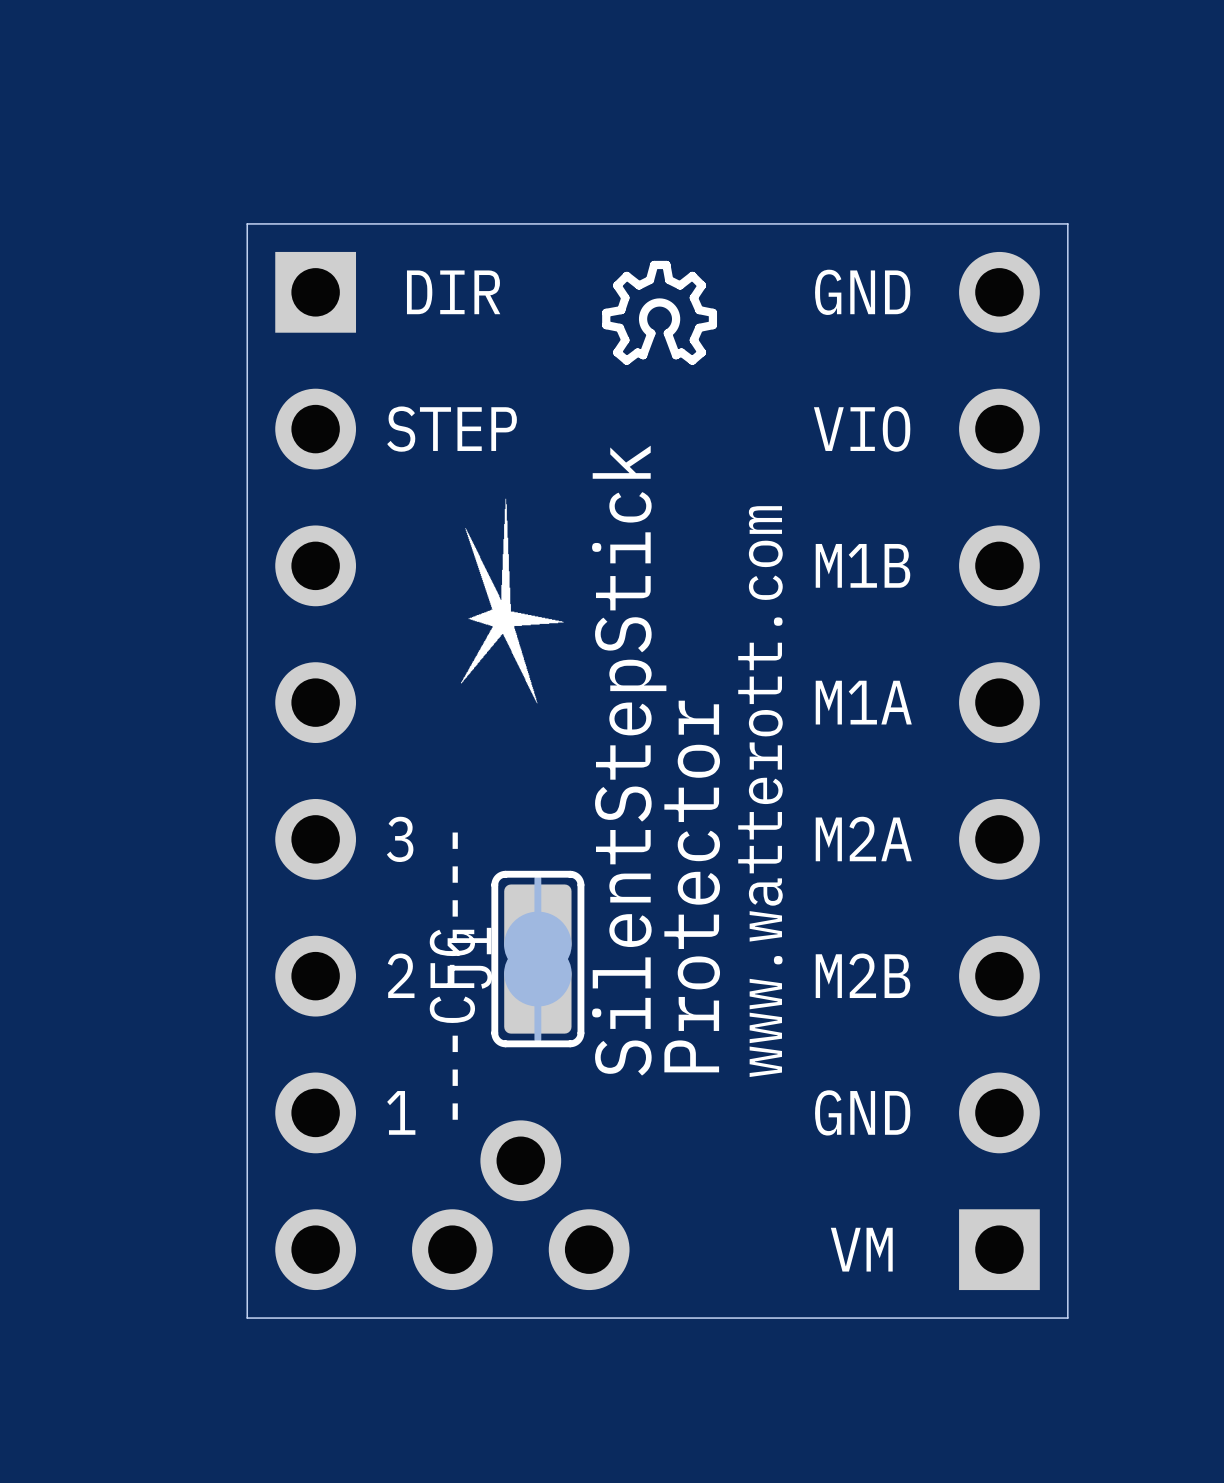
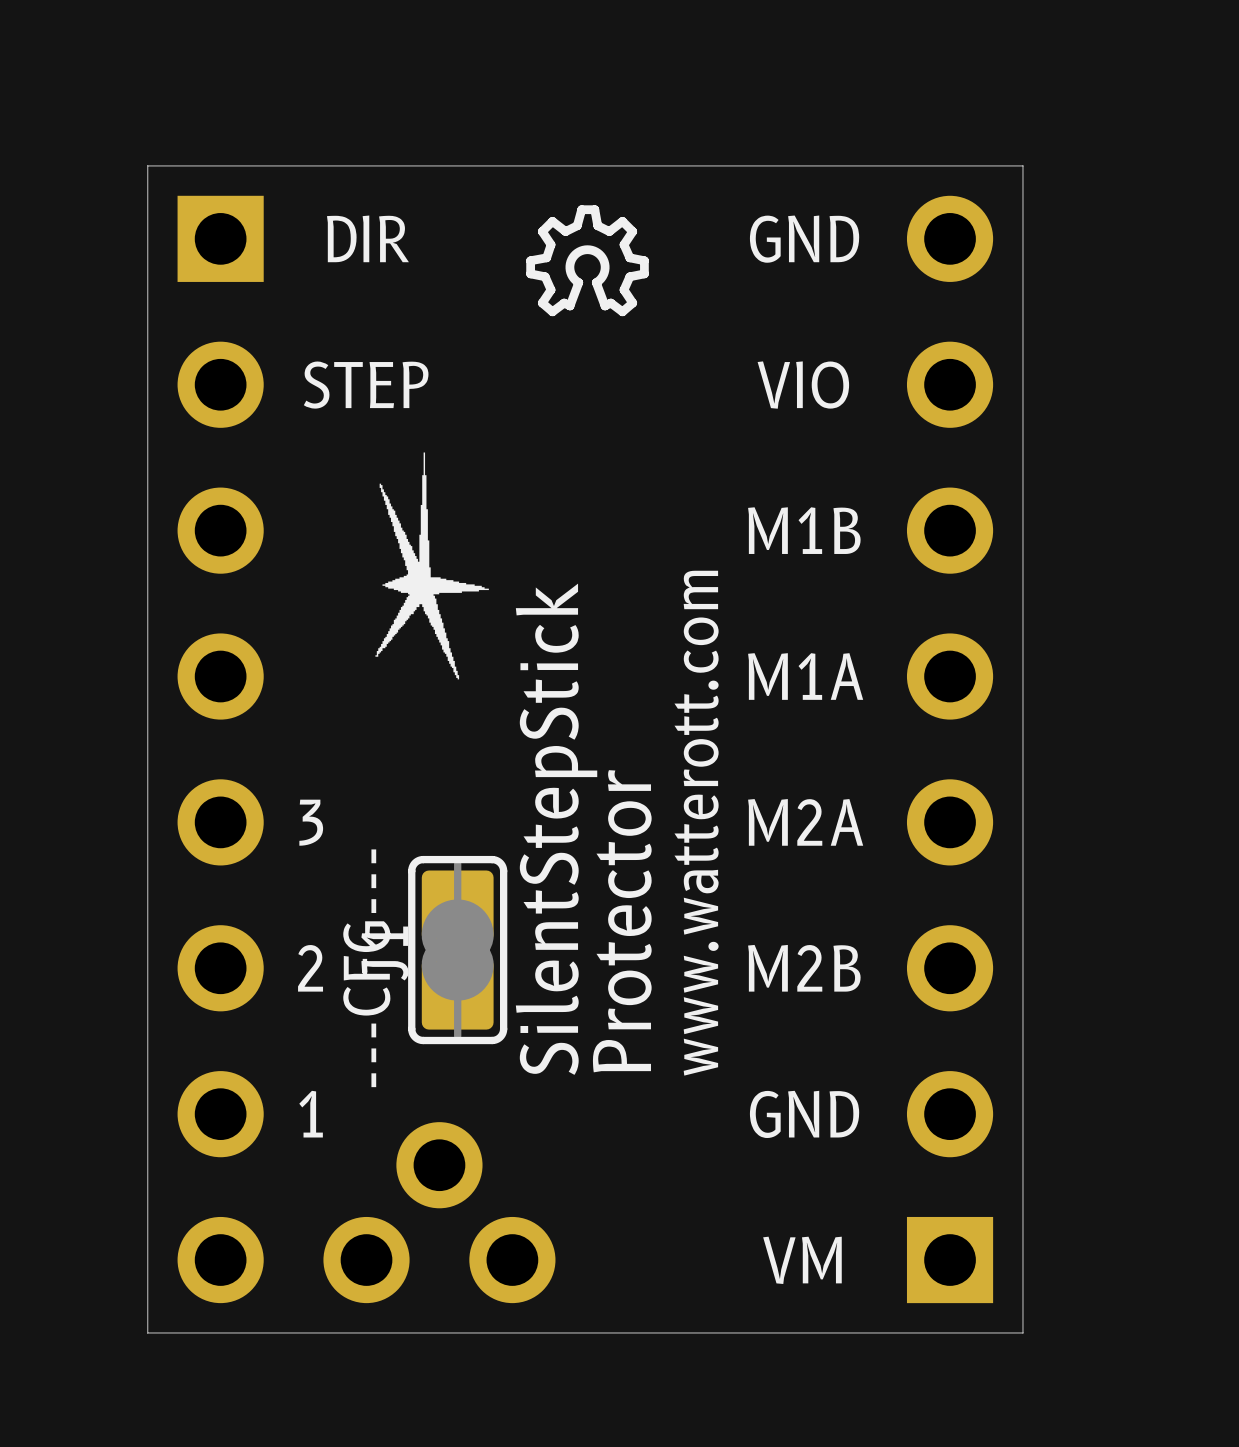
drawing shape: [461, 498, 564, 704] -> [375, 452, 489, 680]

